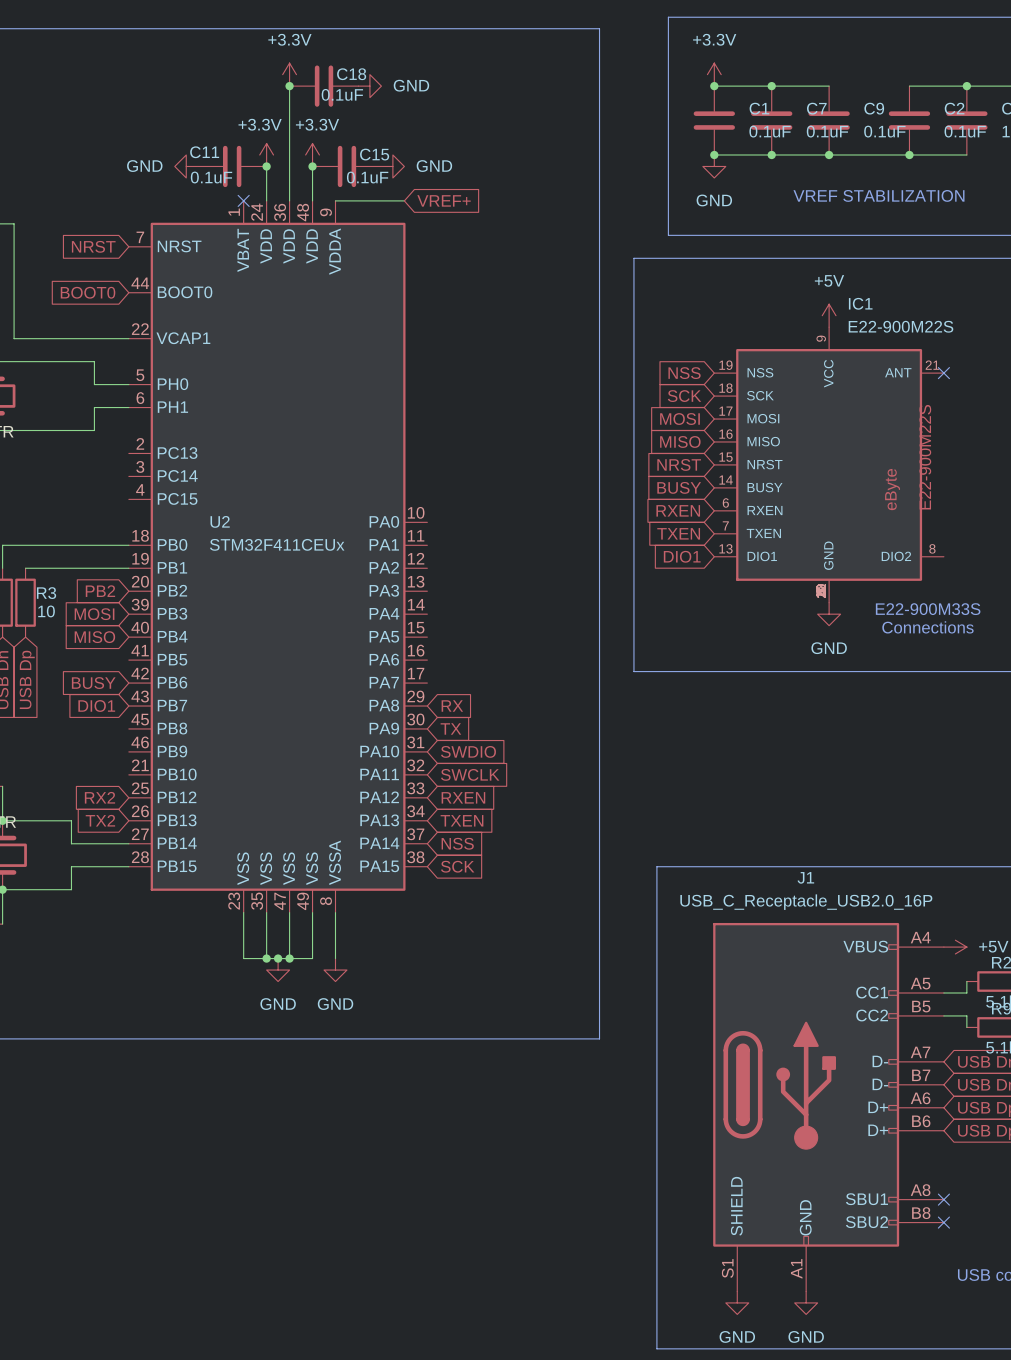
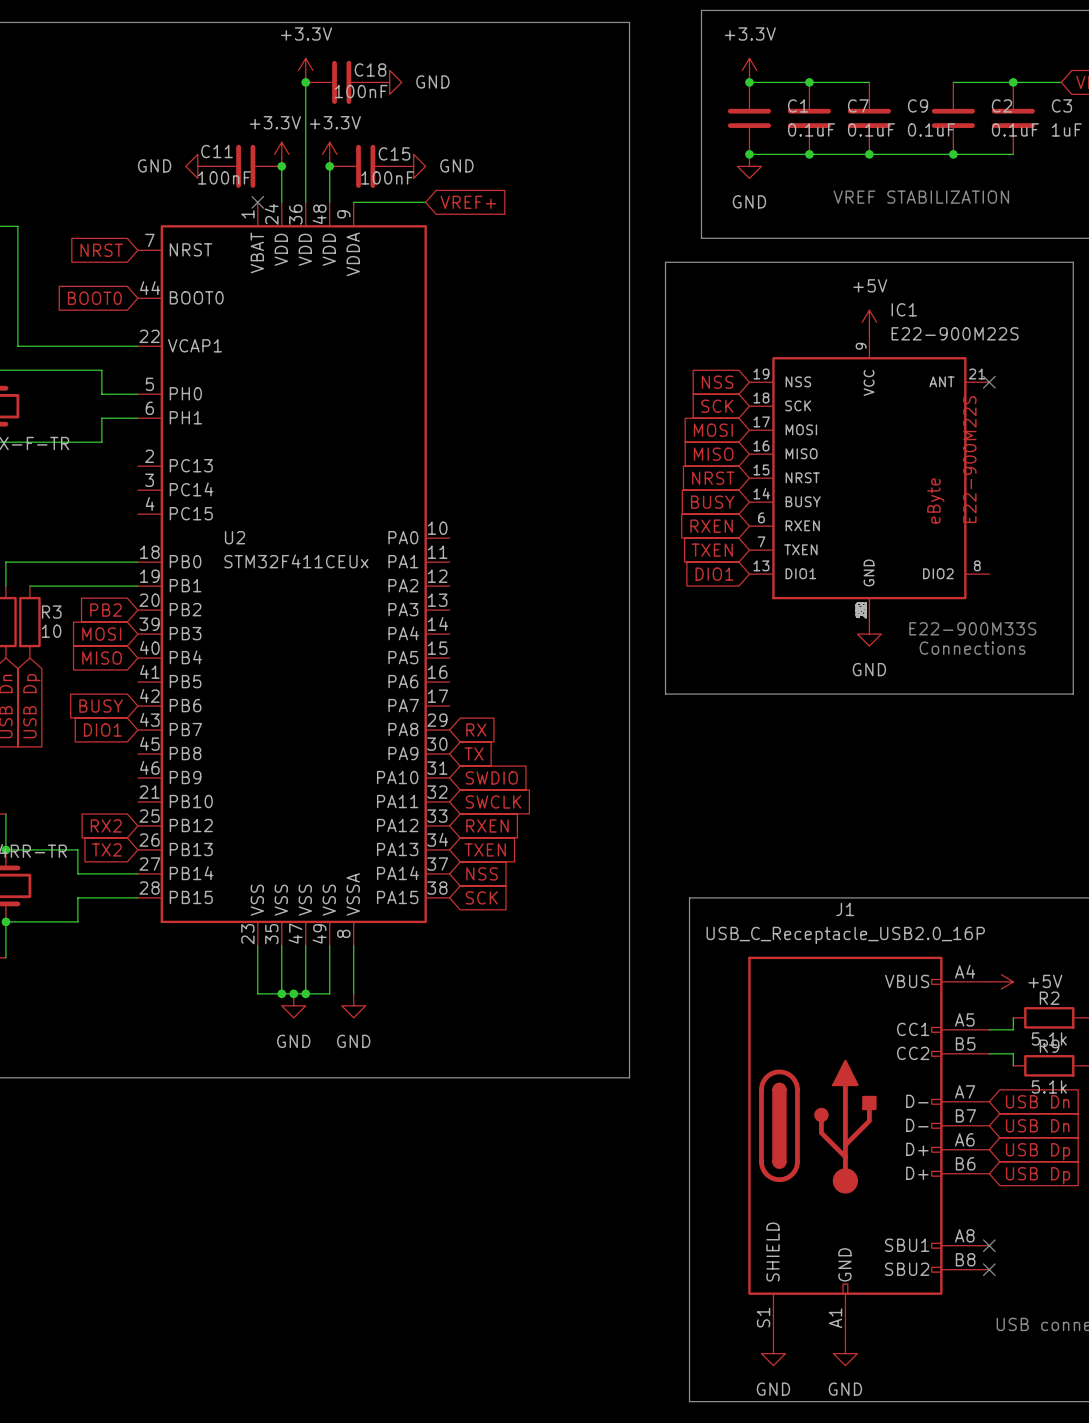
C18 value: 0.1uF (342, 94) -> 100nF (361, 91)
C11 value: 0.1uF (211, 177) -> 100nF (224, 177)
C15 value: 0.1uF (367, 177) -> 100nF (387, 177)

